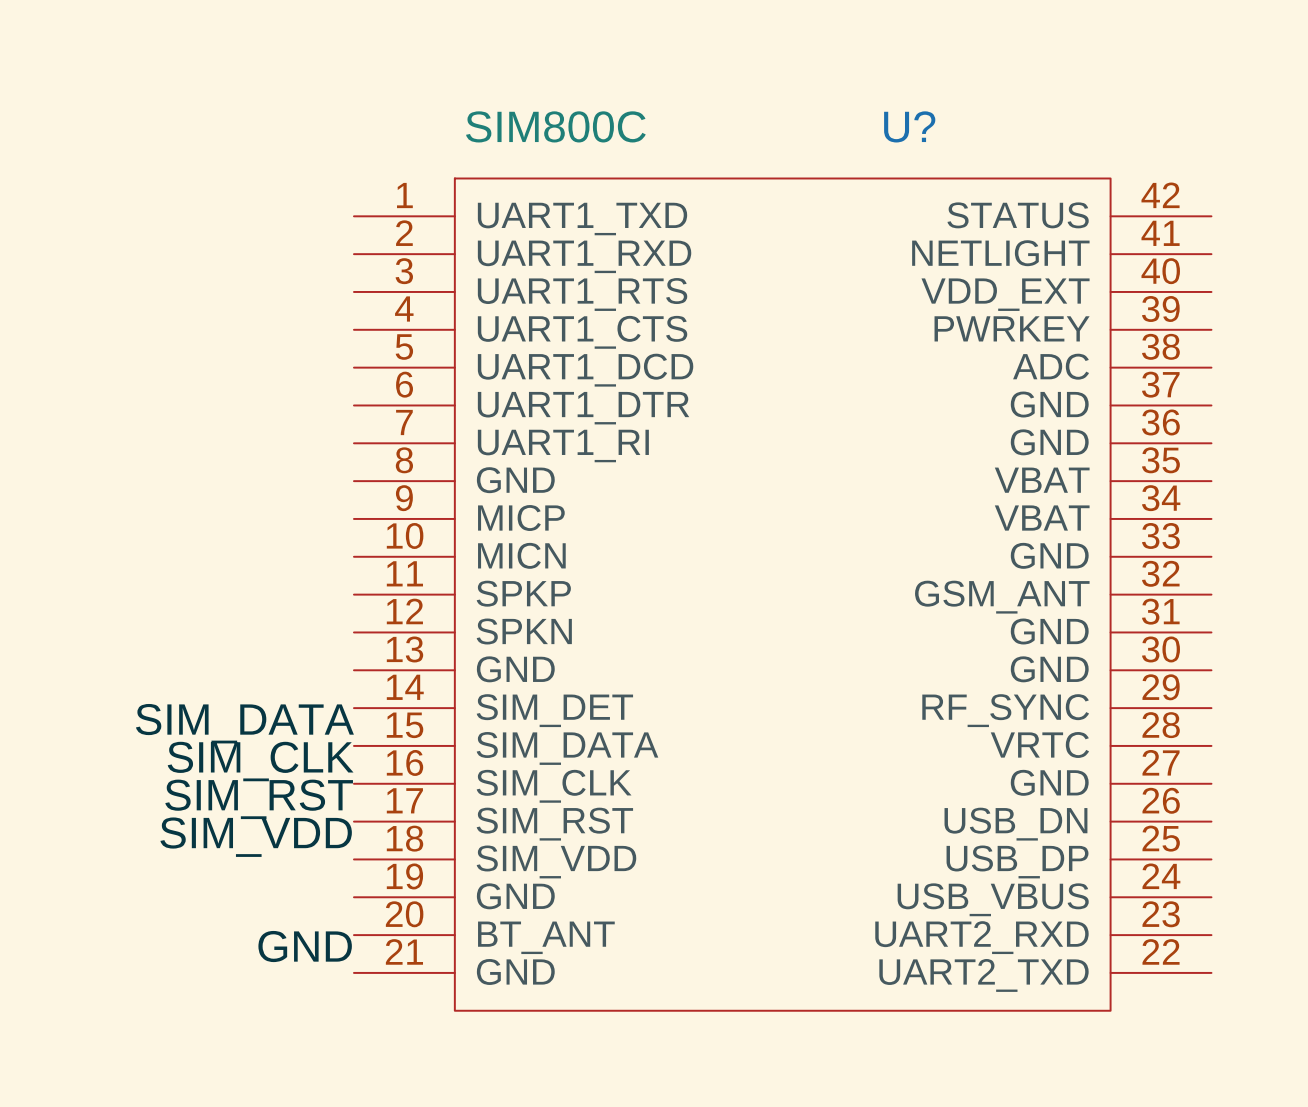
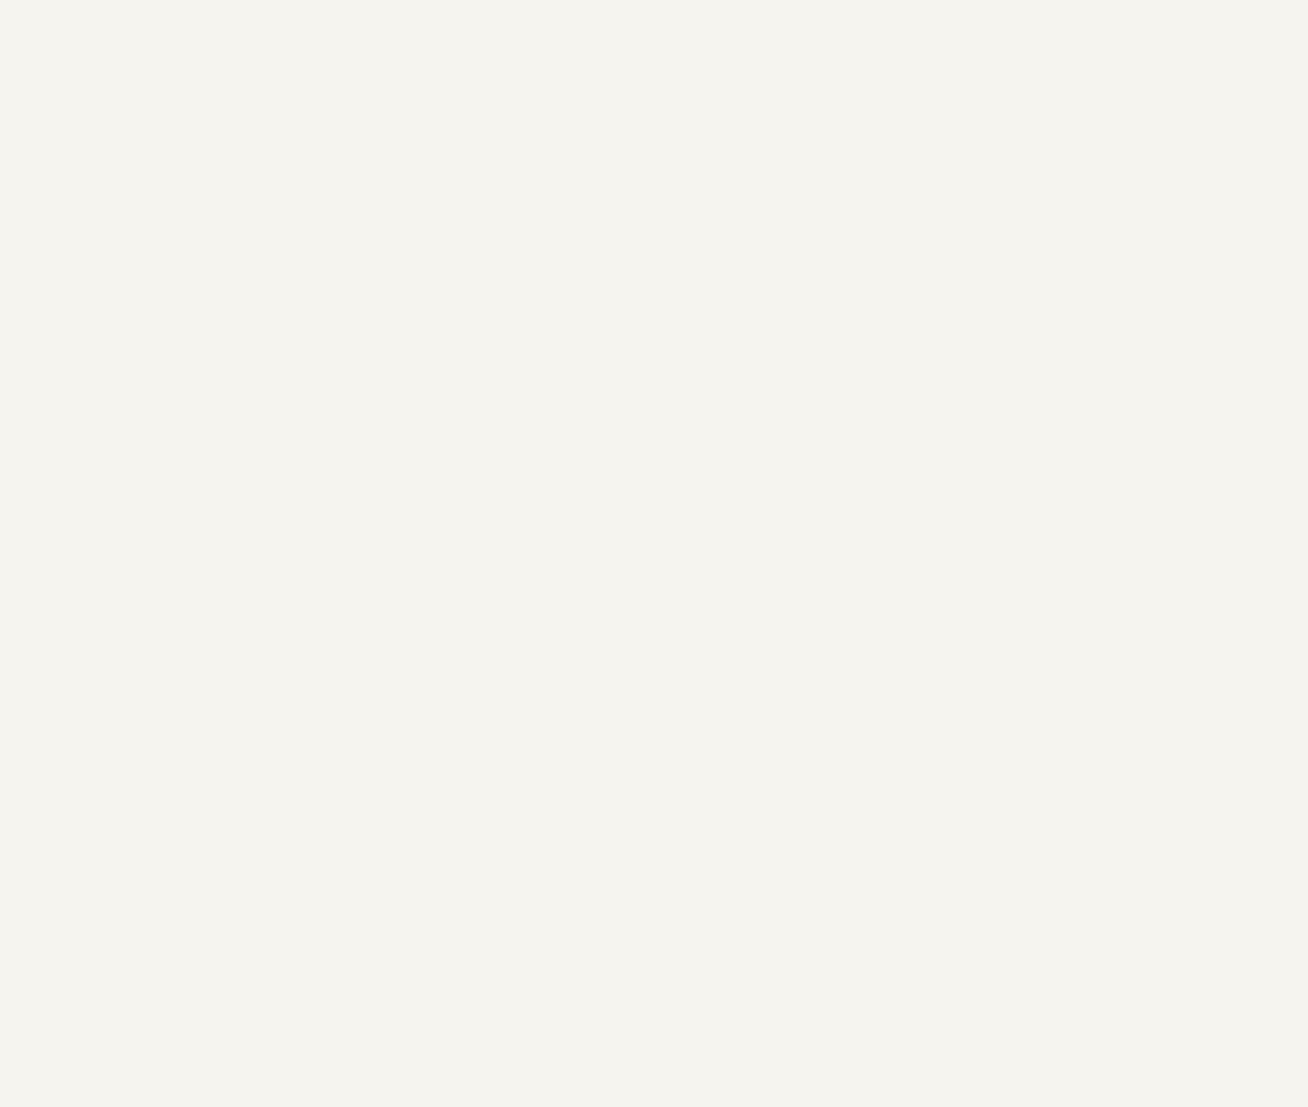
U?: SIM800C (782, 594) -> none
label: SIM_DATA (244, 723) -> none
label: SIM_CLK (260, 761) -> none
label: SIM_RST (259, 799) -> none
label: SIM_VDD (256, 837) -> none
label: GND (305, 946) -> none

